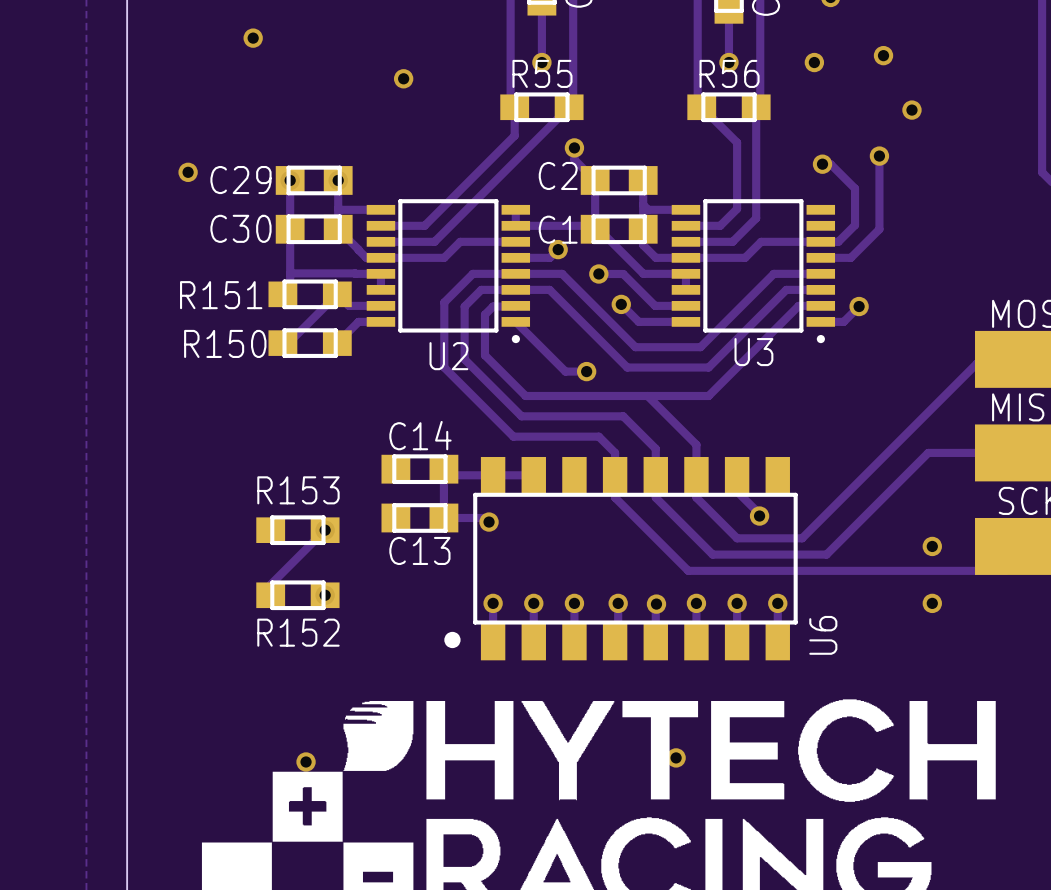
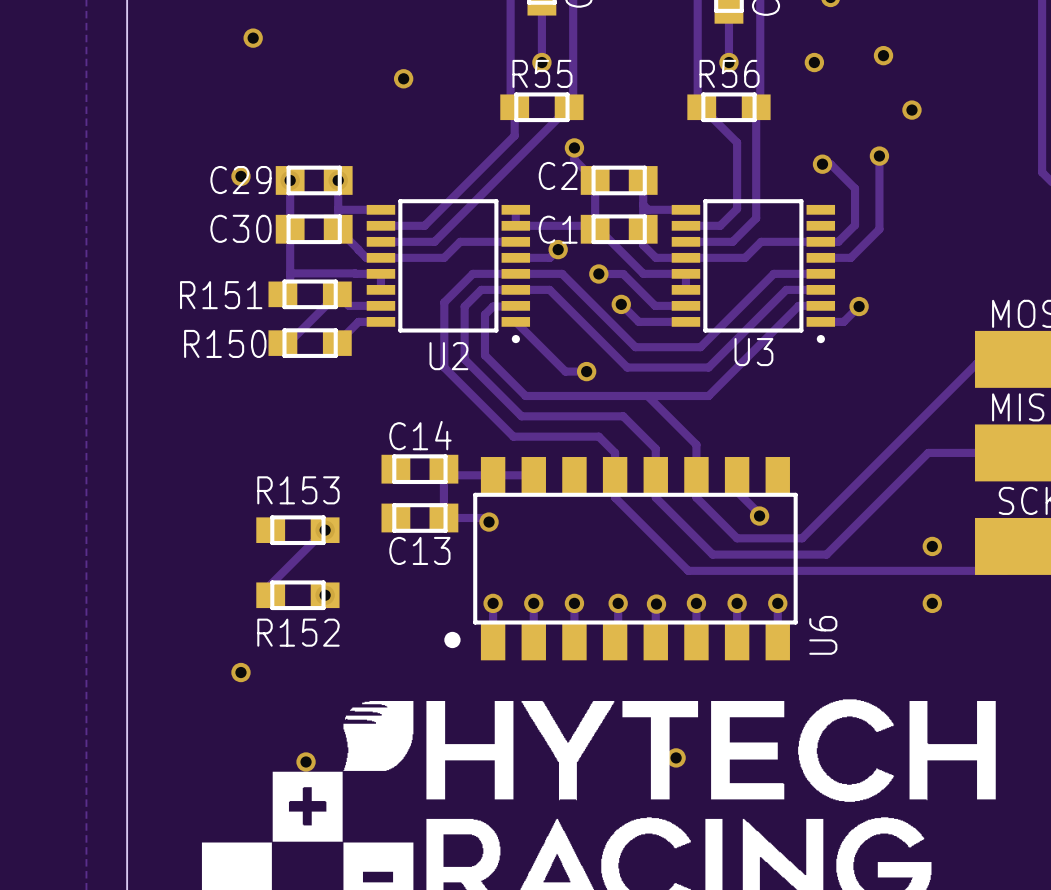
via position: (188, 172) -> (240, 176)
via: none -> (240, 672)

